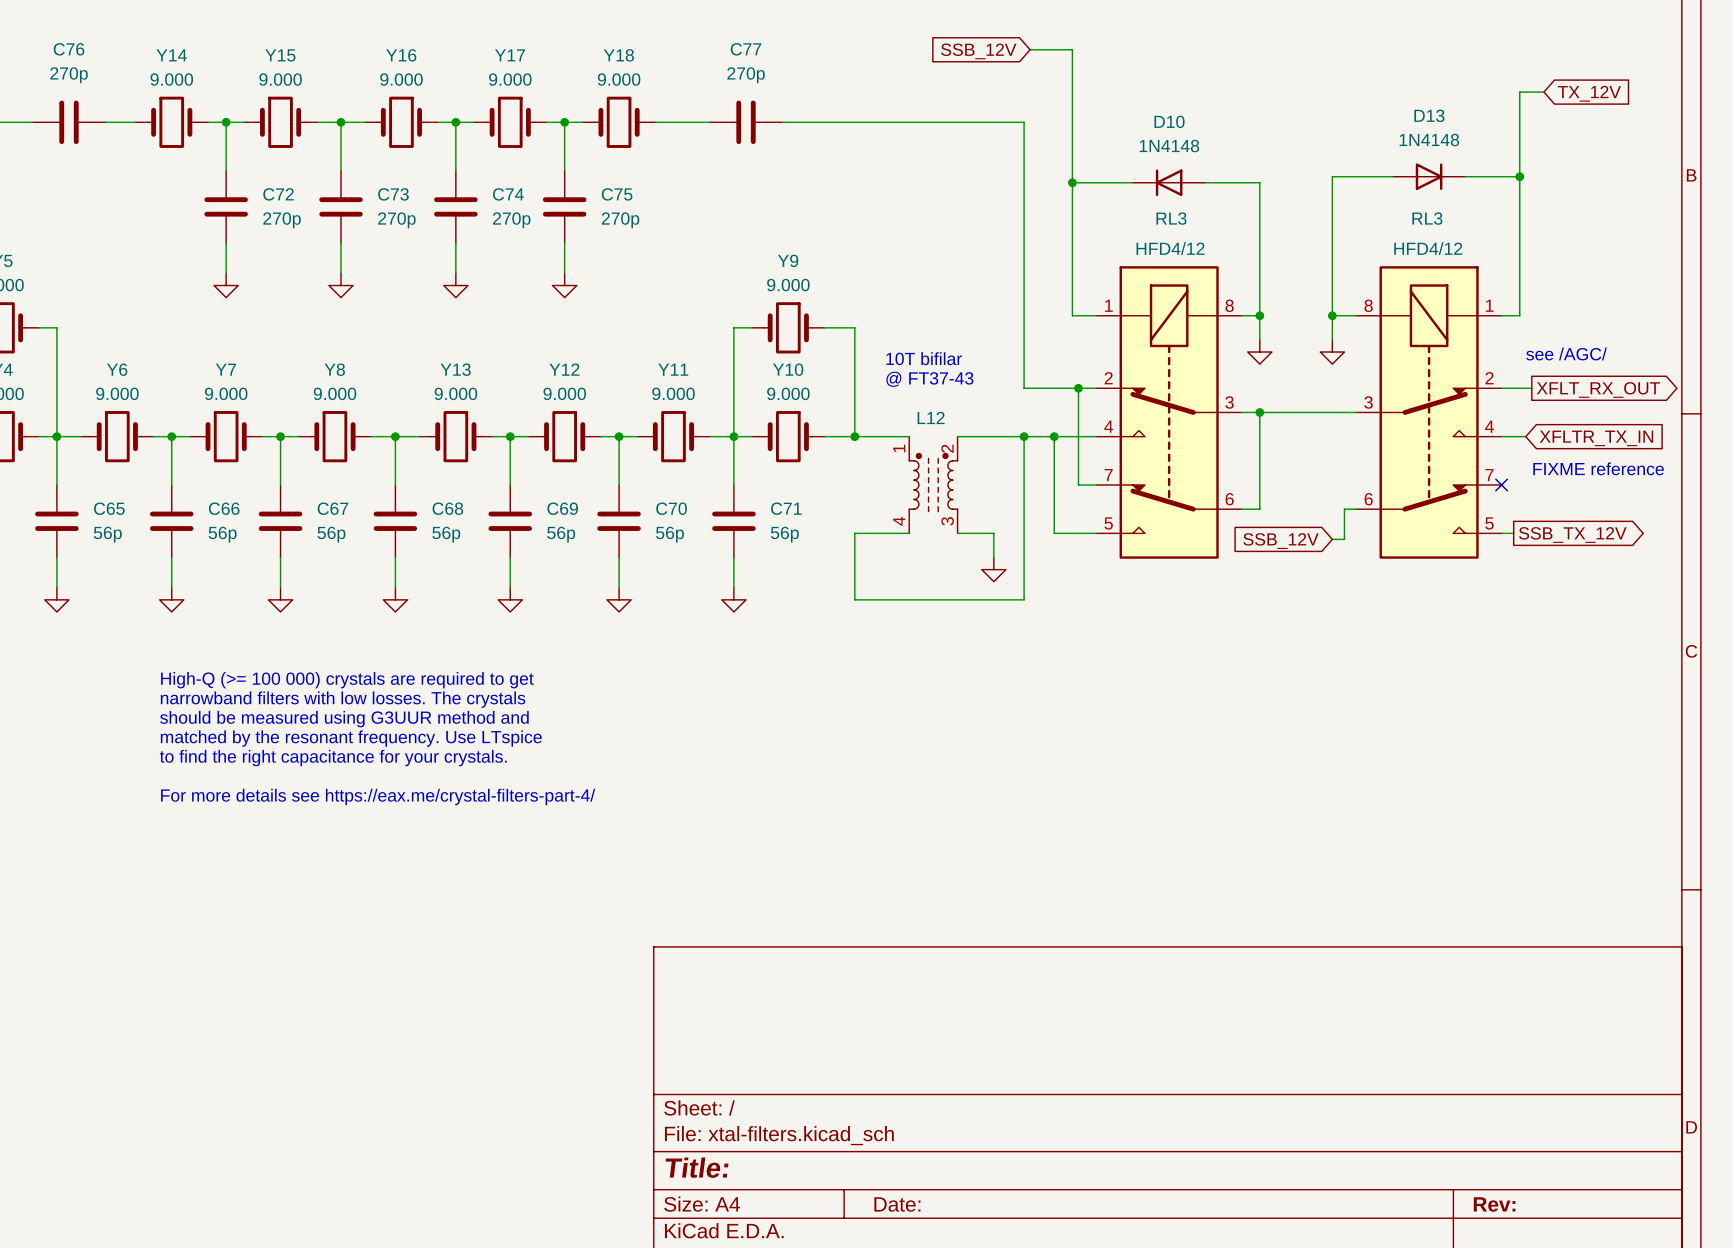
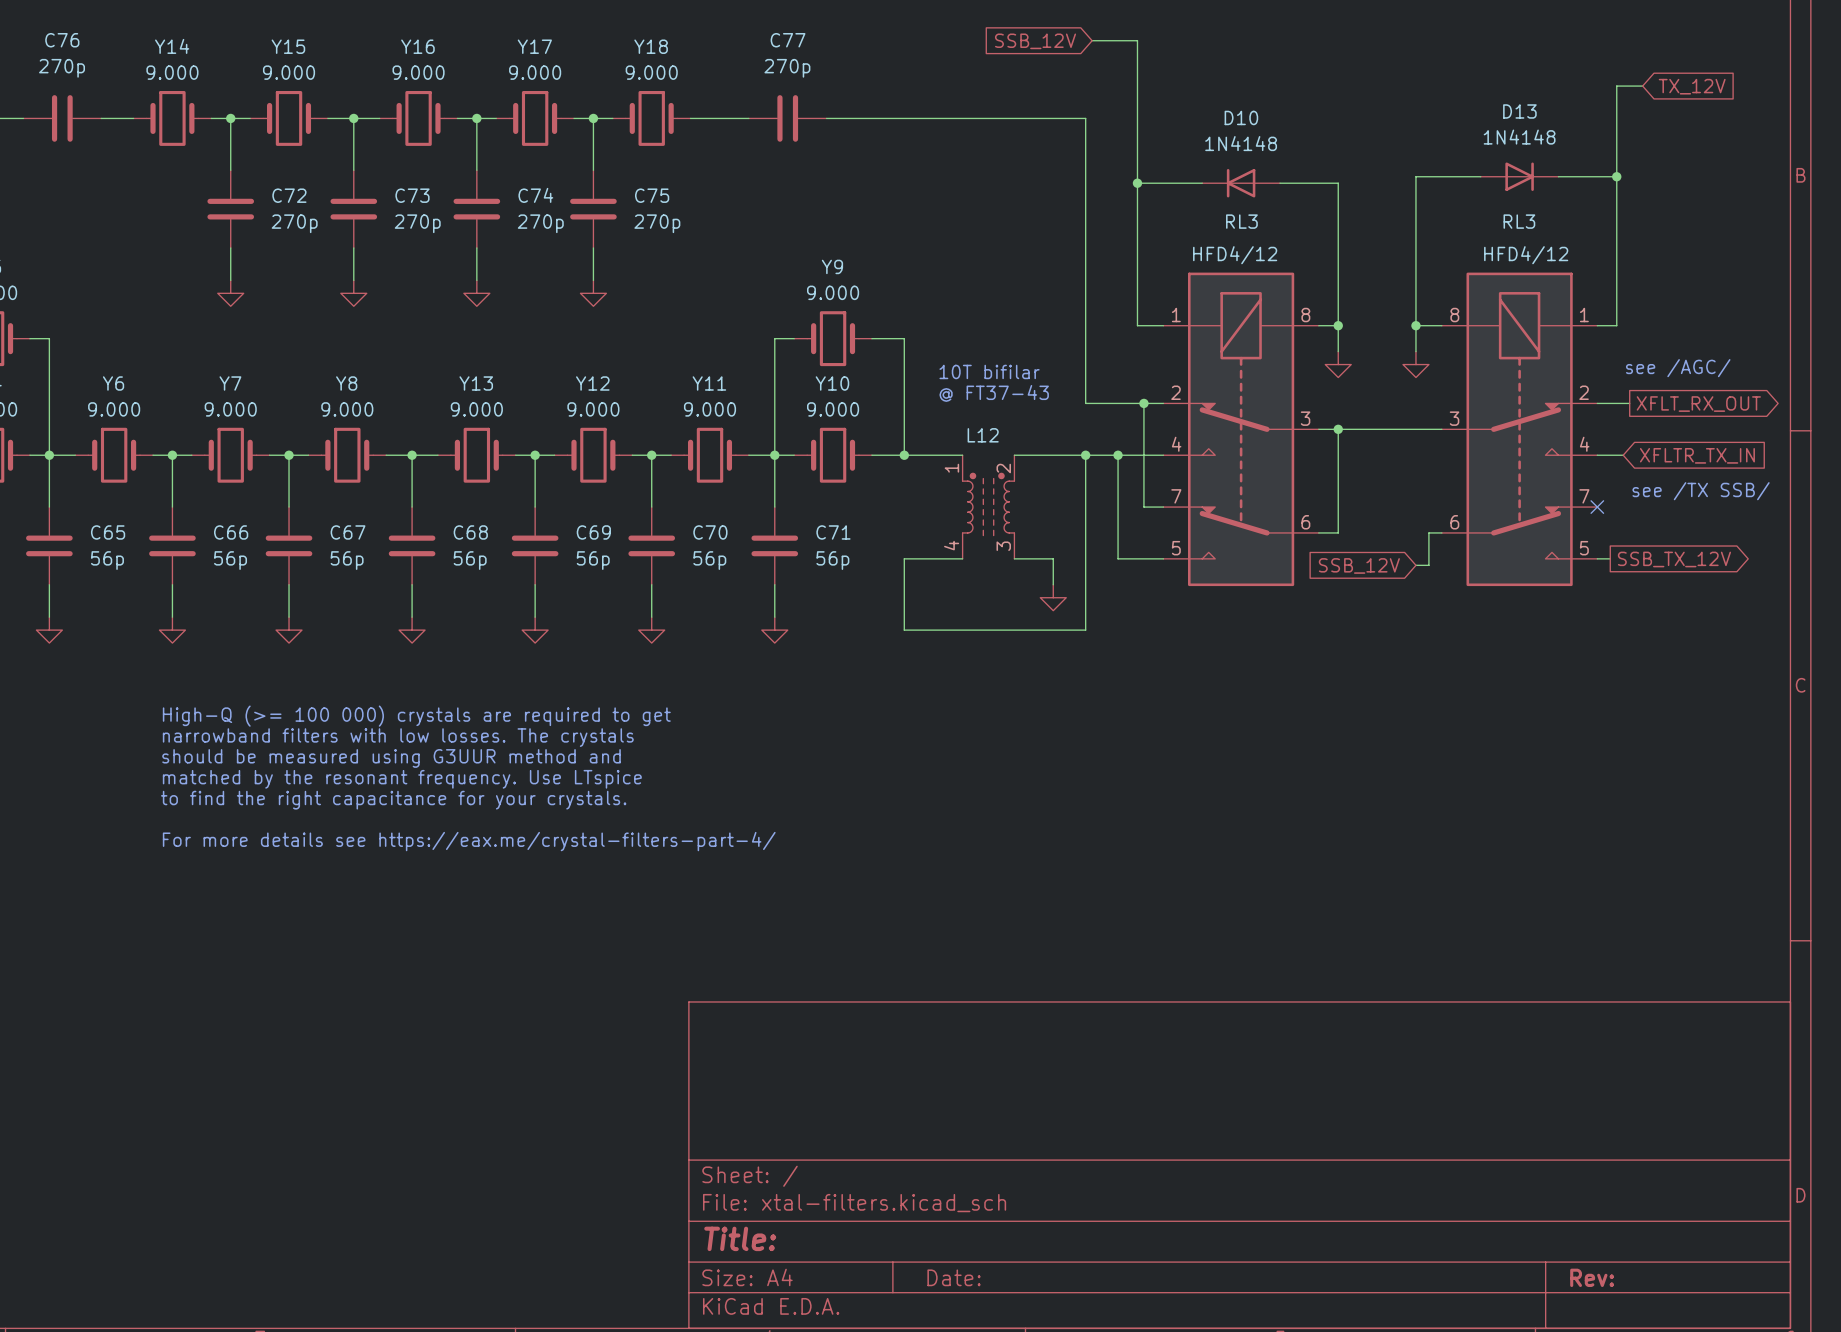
text: FIXME reference (1598, 468) -> see /TX SSB/ (1701, 491)

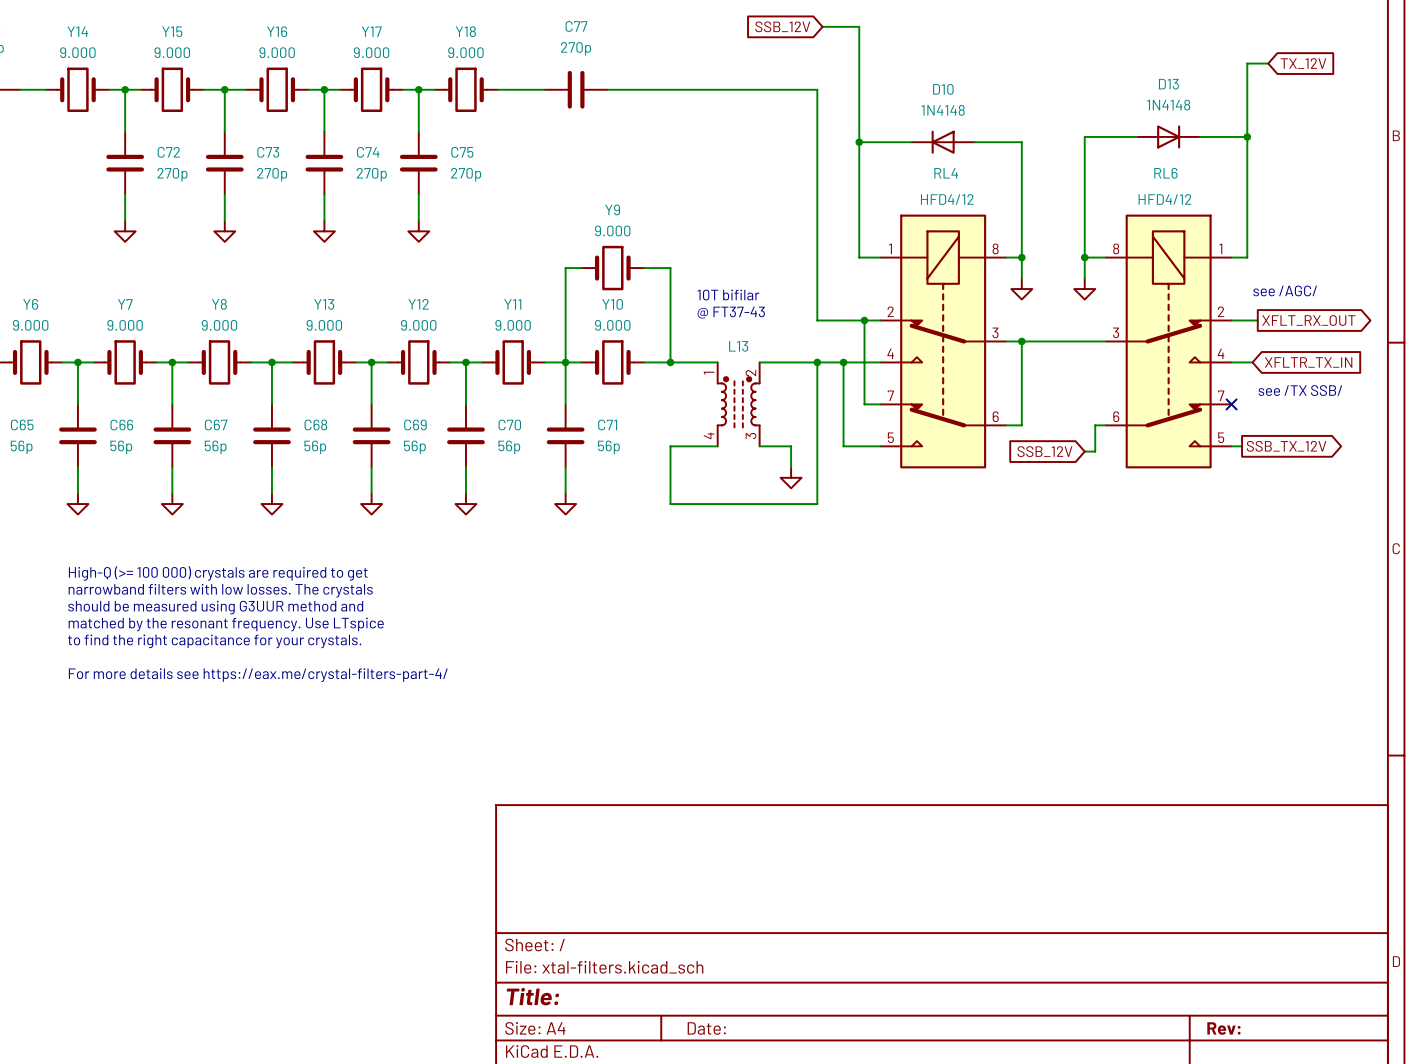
RL3 name: RL3 (1241, 221) -> RL4 (946, 173)
RL3 name: RL3 (1519, 221) -> RL6 (1165, 173)
L12 name: L12 (983, 435) -> L13 (738, 346)

